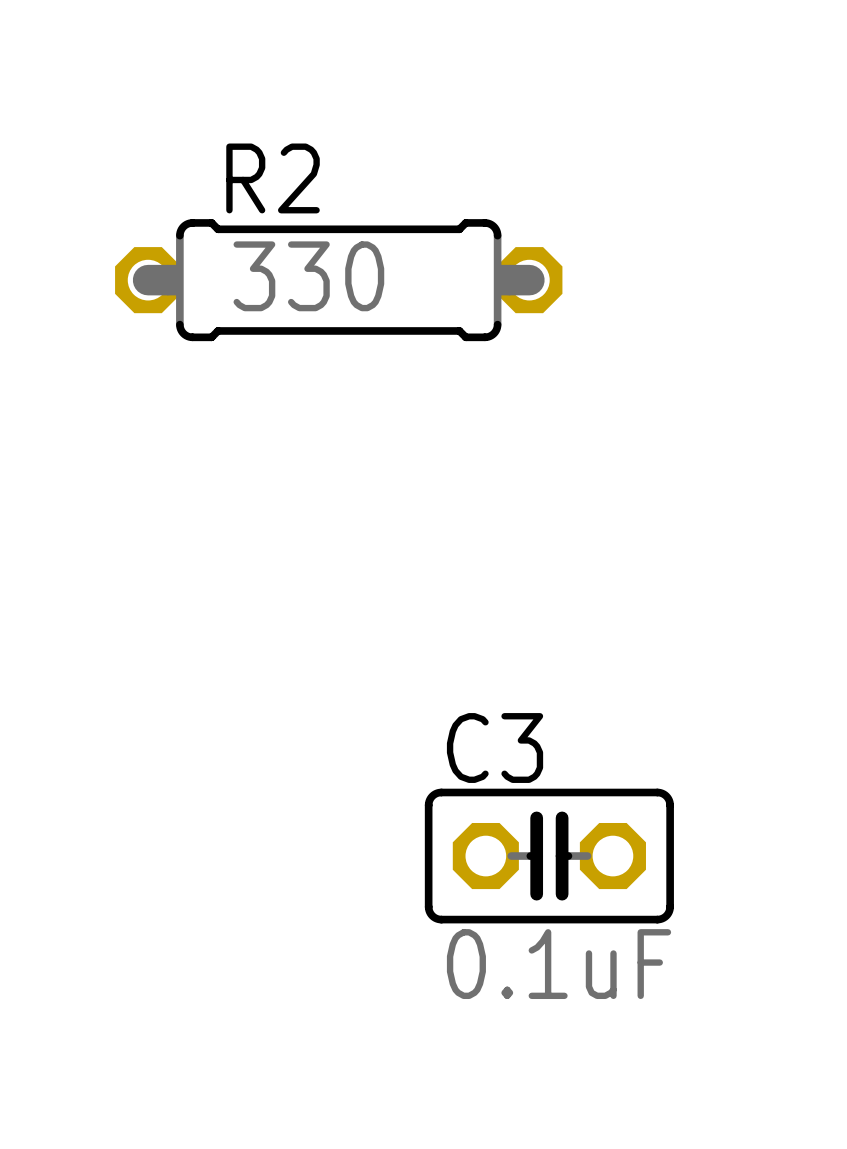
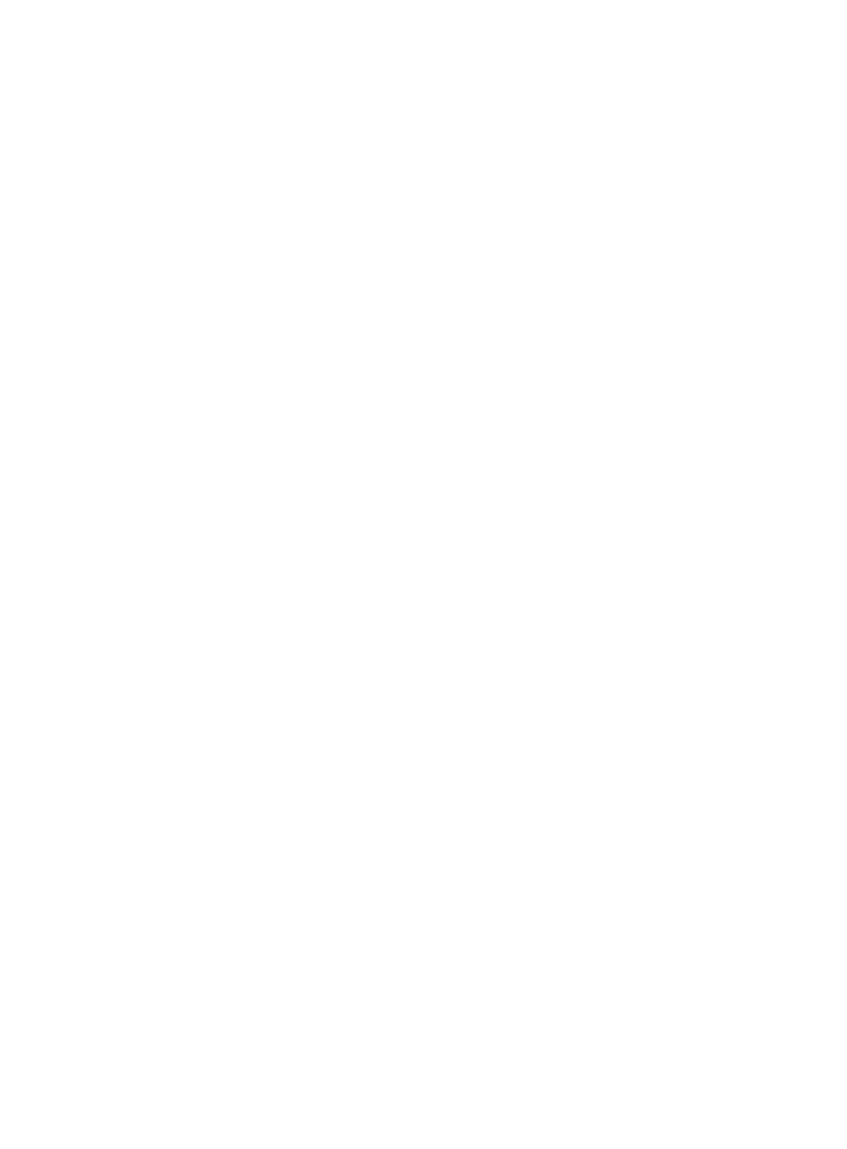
R2: 330 (338, 280) -> none
C3: 0.1uF (549, 856) -> none

